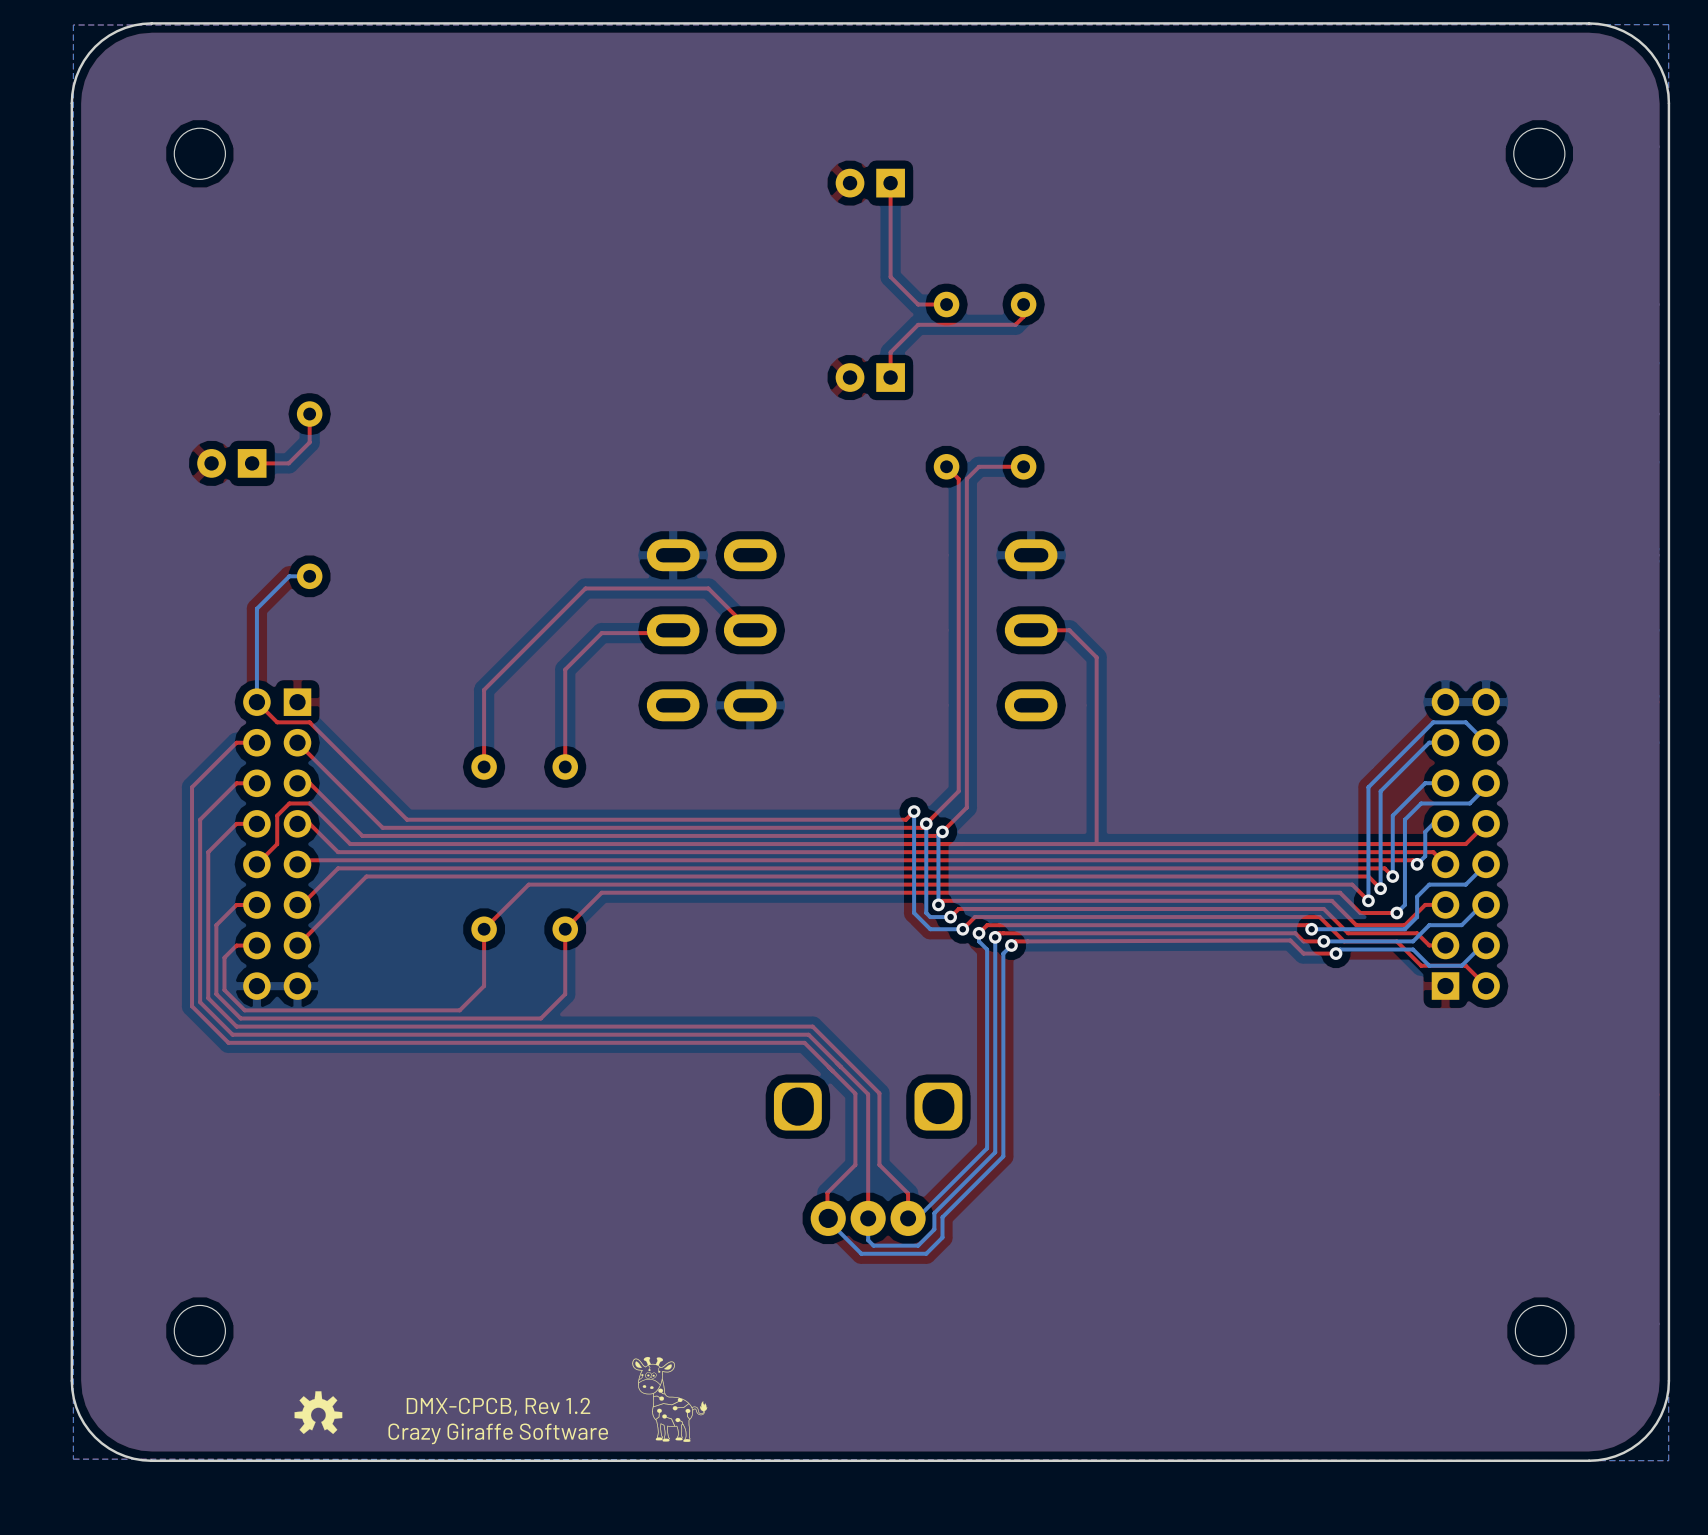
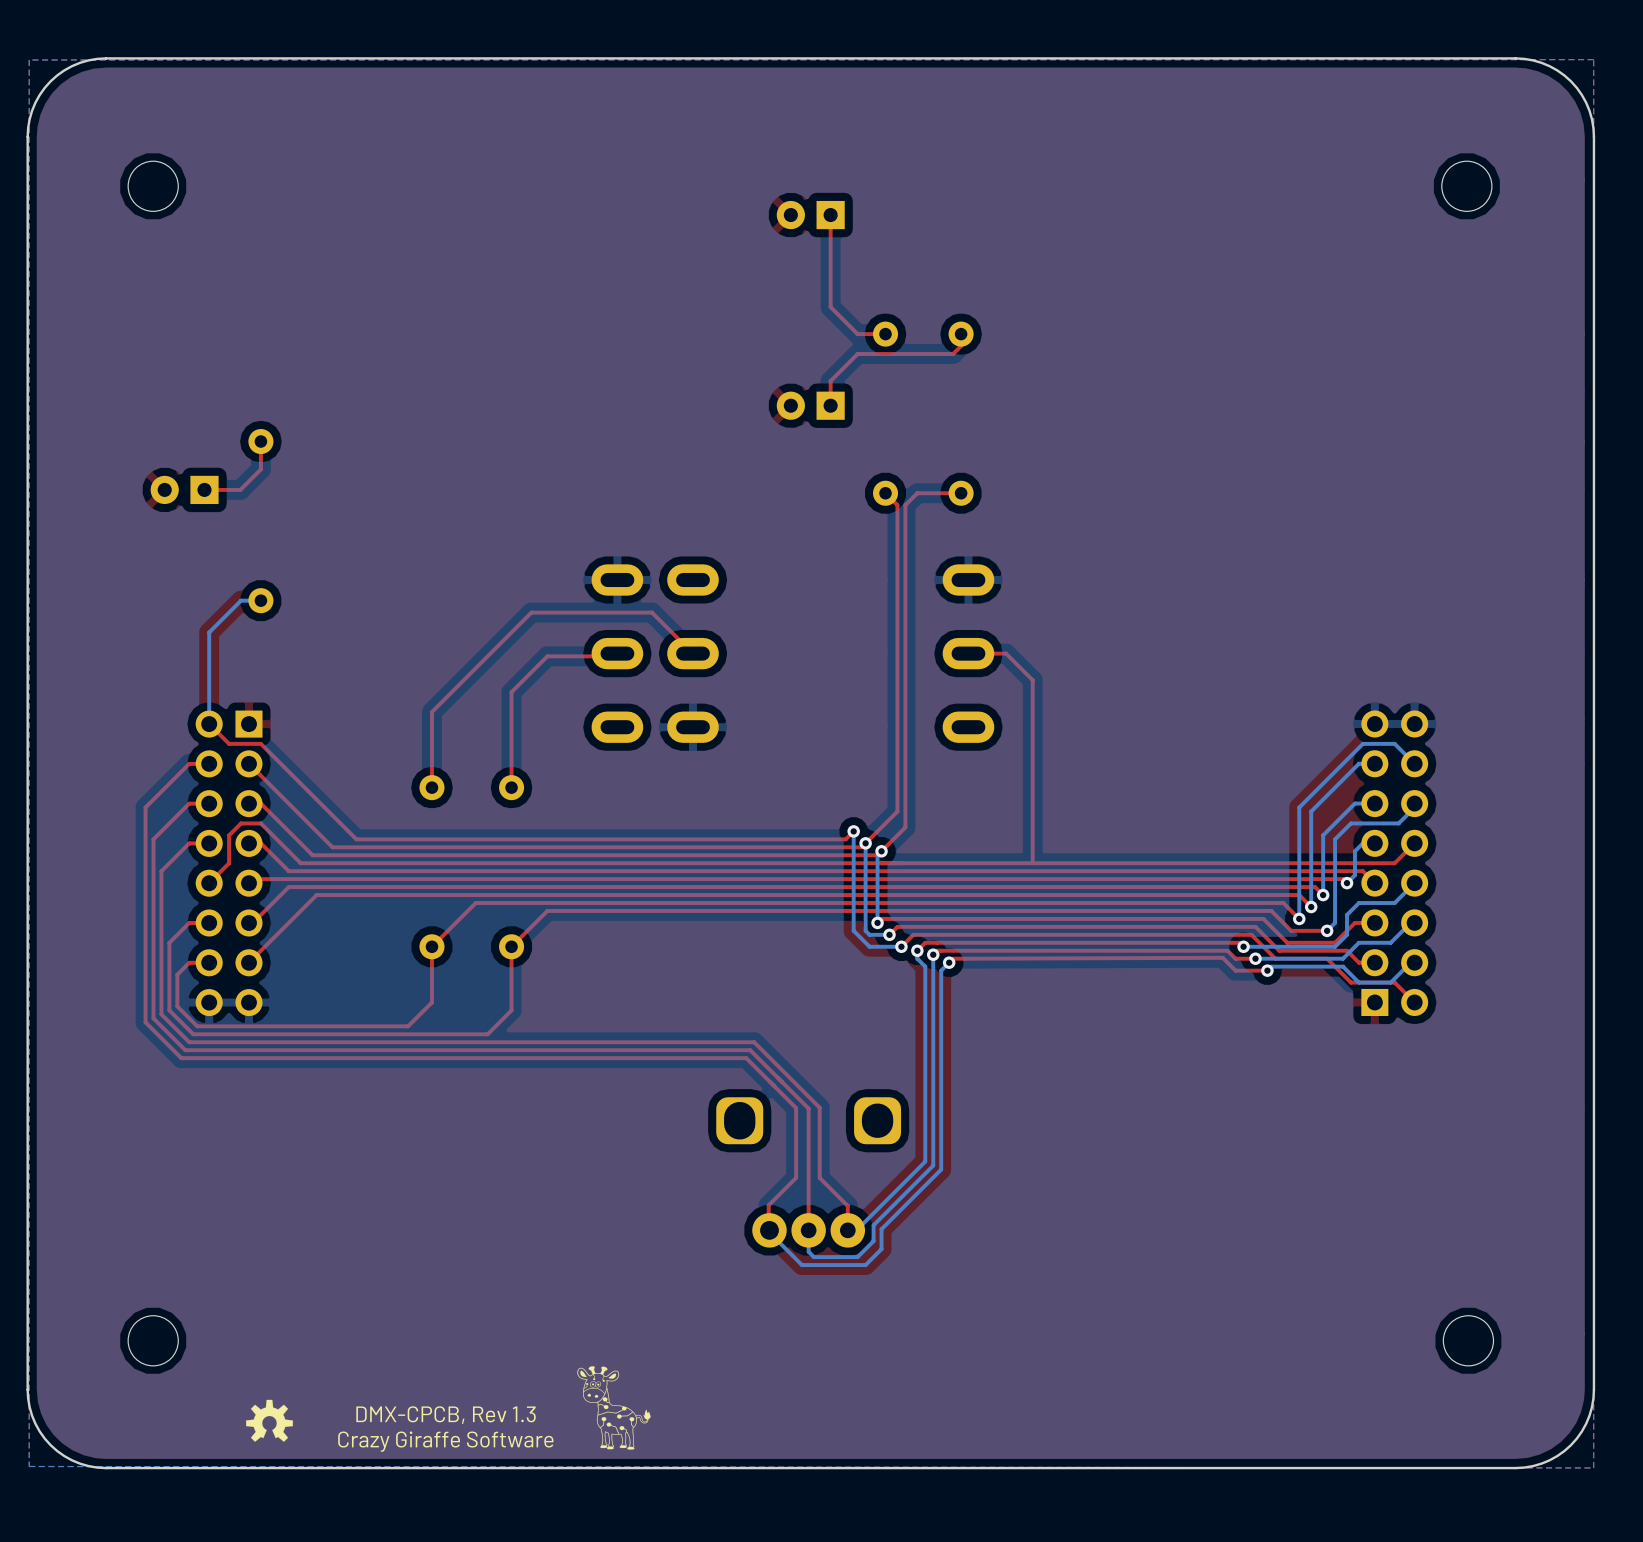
text: DMX-CPCB, Rev 1.2 (498, 1406) -> DMX-CPCB, Rev 1.3 (446, 1415)

